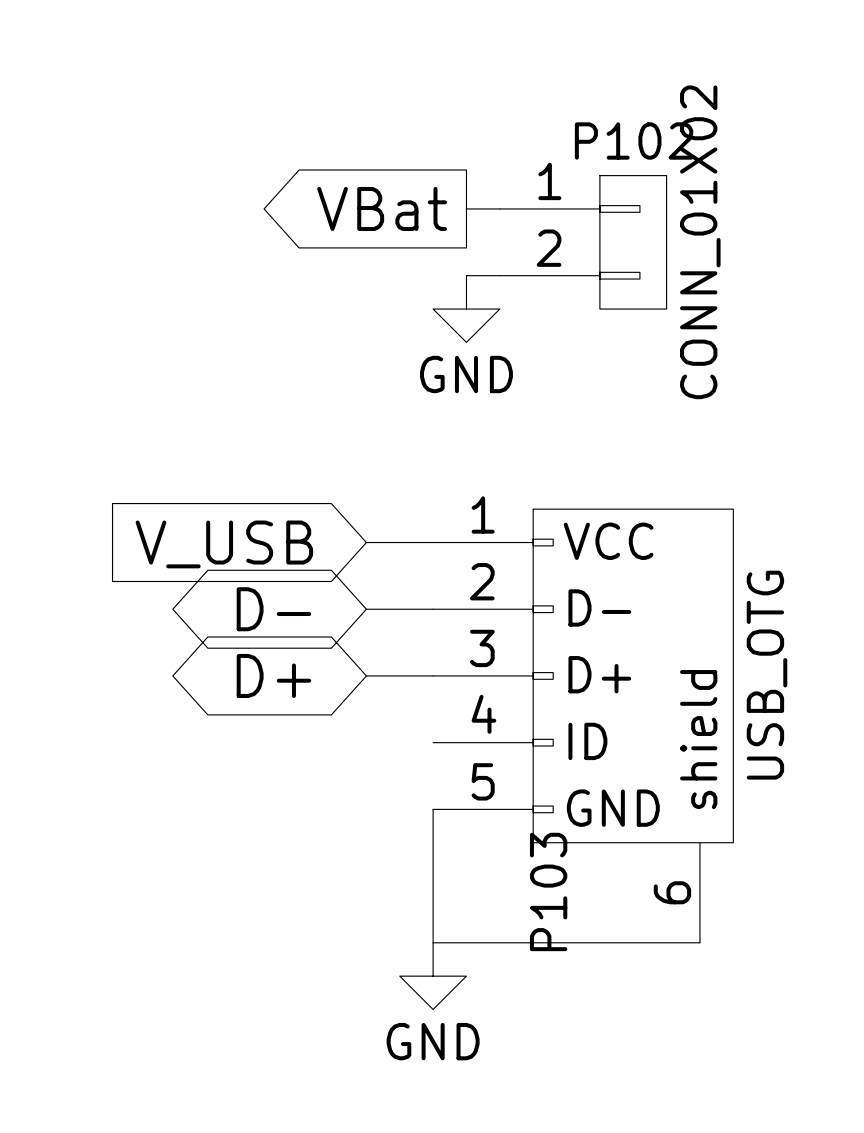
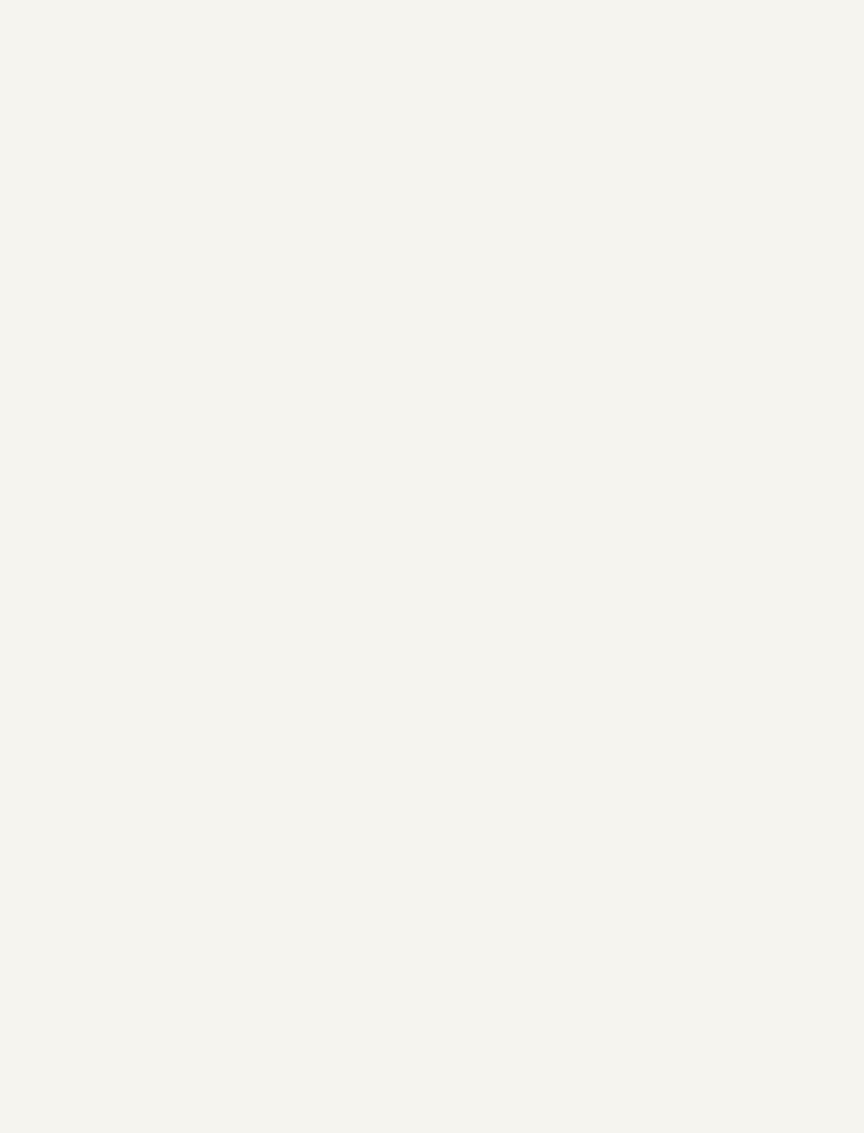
global label: VBat (382, 208) -> none
wire: (466, 208) (499, 208) -> none
P102: CONN_01X02 (583, 242) -> none
wire: (466, 275) (499, 275) -> none
power symbol: GND (466, 309) -> none
wire: (366, 542) (433, 542) -> none
global label: V_USB (224, 544) -> none
global label: D- (273, 609) -> none
wire: (366, 609) (433, 609) -> none
global label: D+ (273, 675) -> none
wire: (366, 675) (433, 675) -> none
P103: USB_OTG (583, 725) -> none
wire: (433, 809) (433, 942) (699, 942) -> none
power symbol: GND (433, 976) -> none

